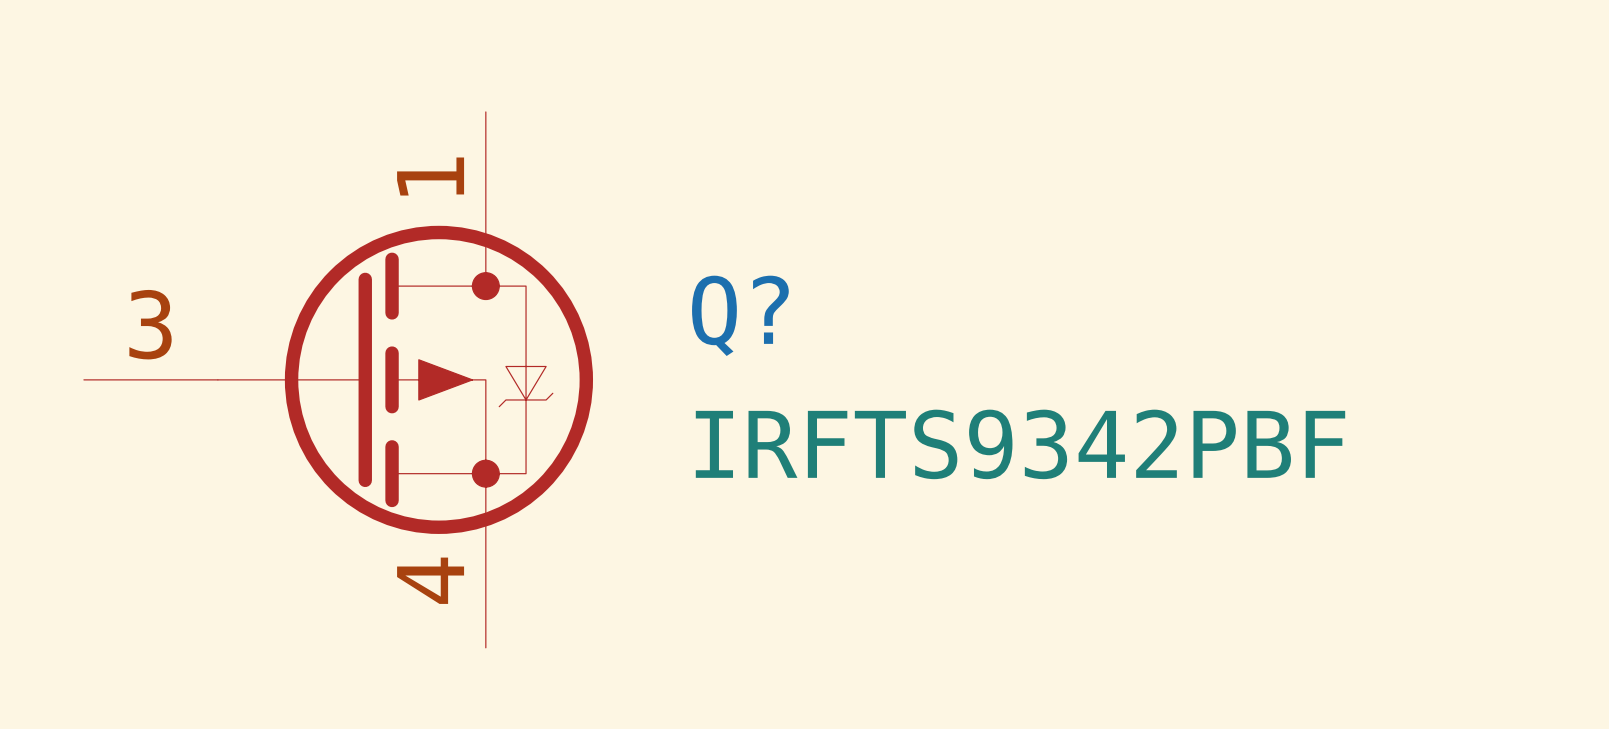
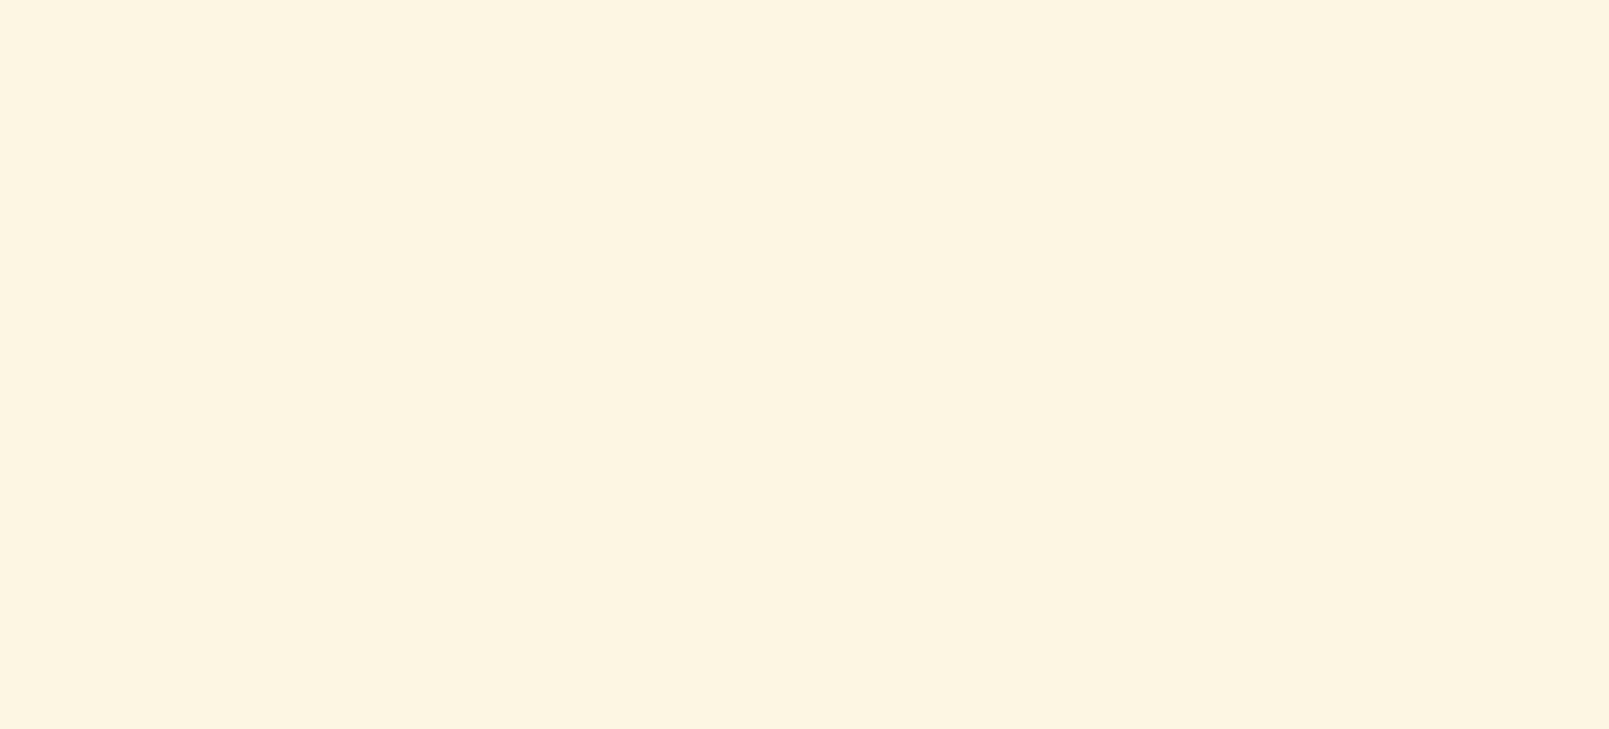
Q?: IRFTS9342PBF (338, 379) -> none

